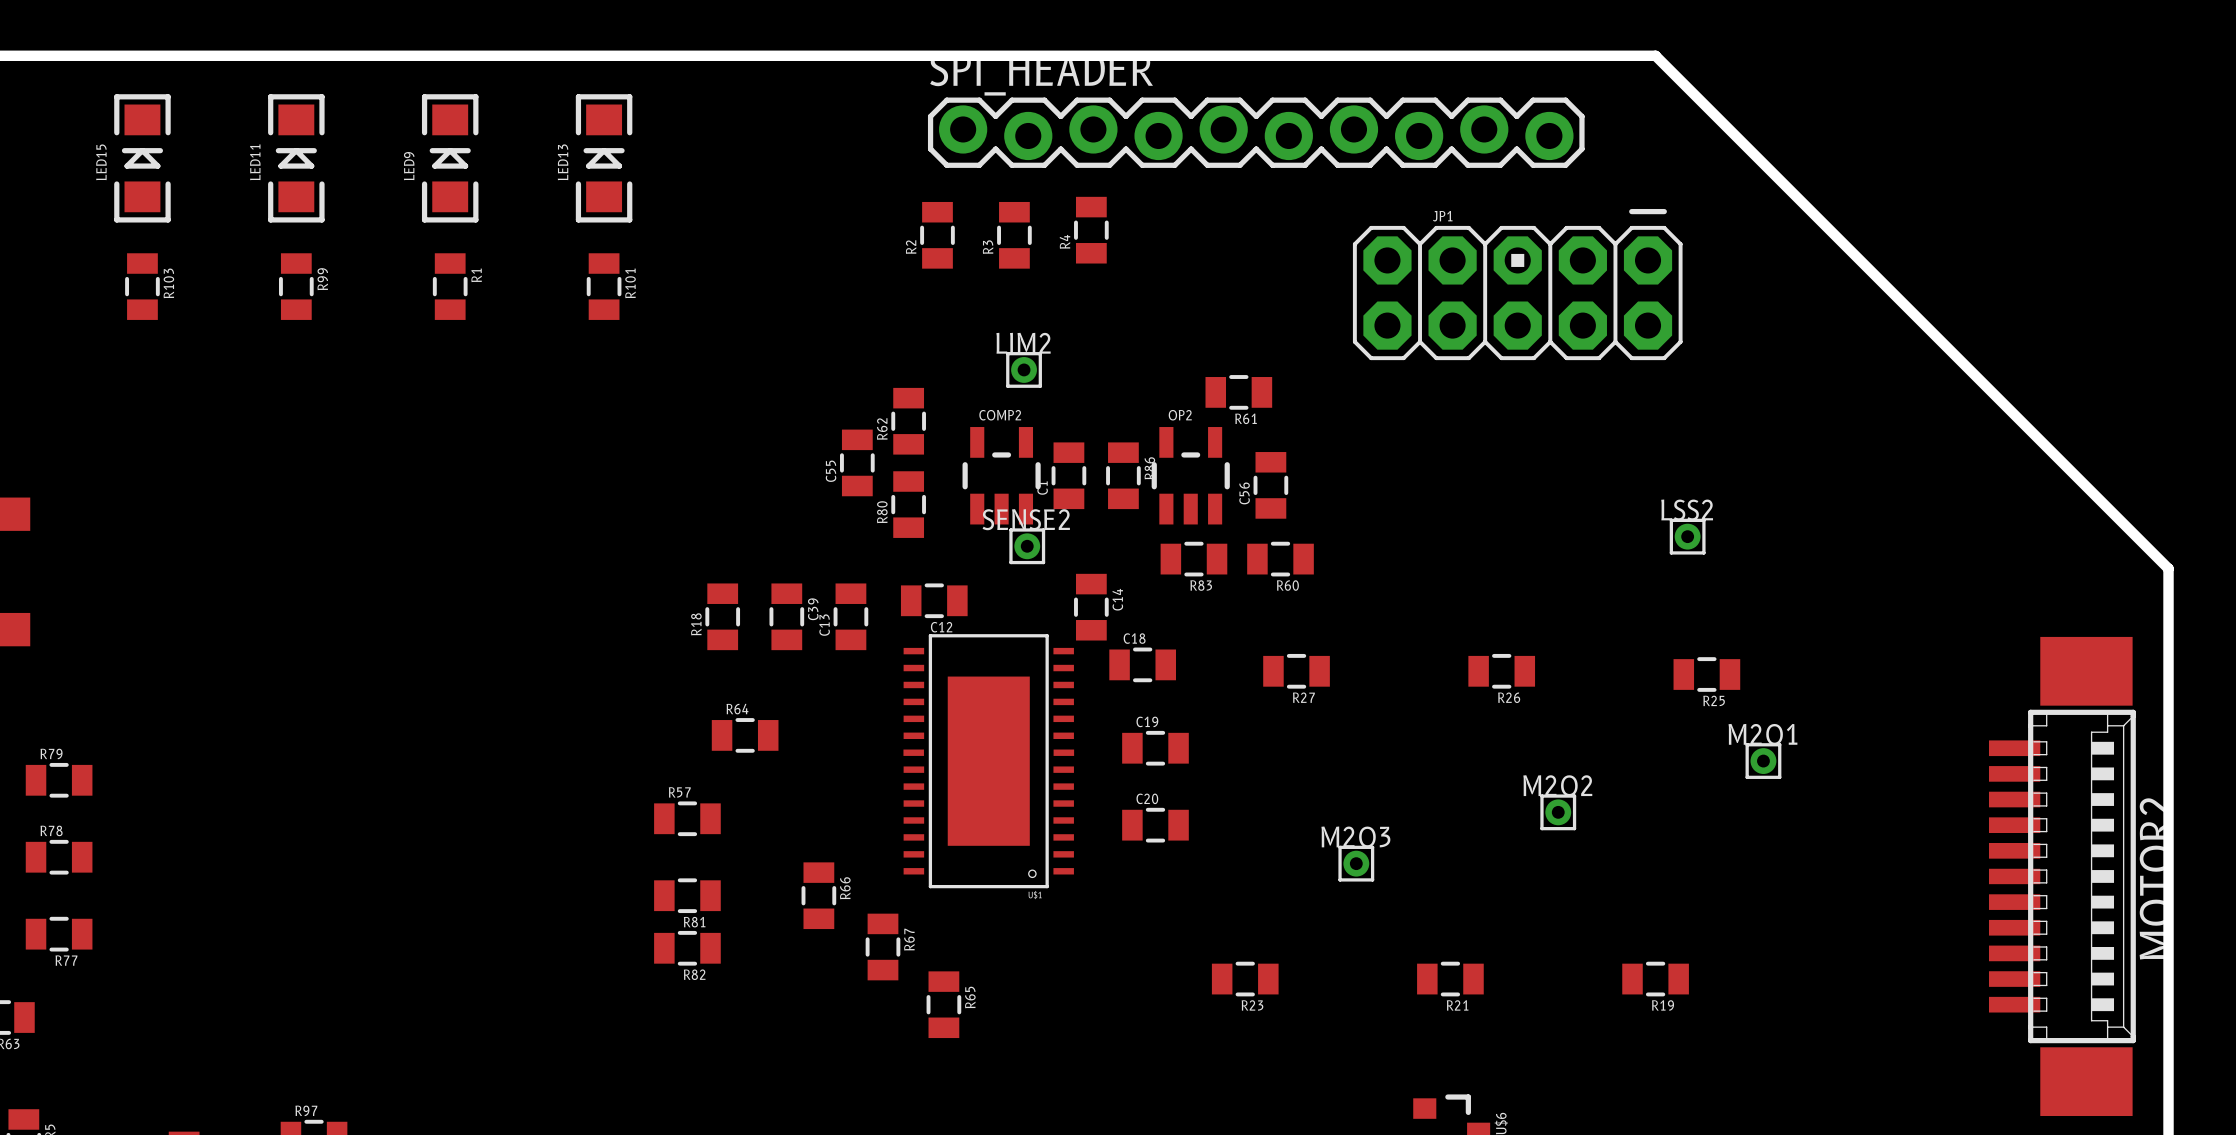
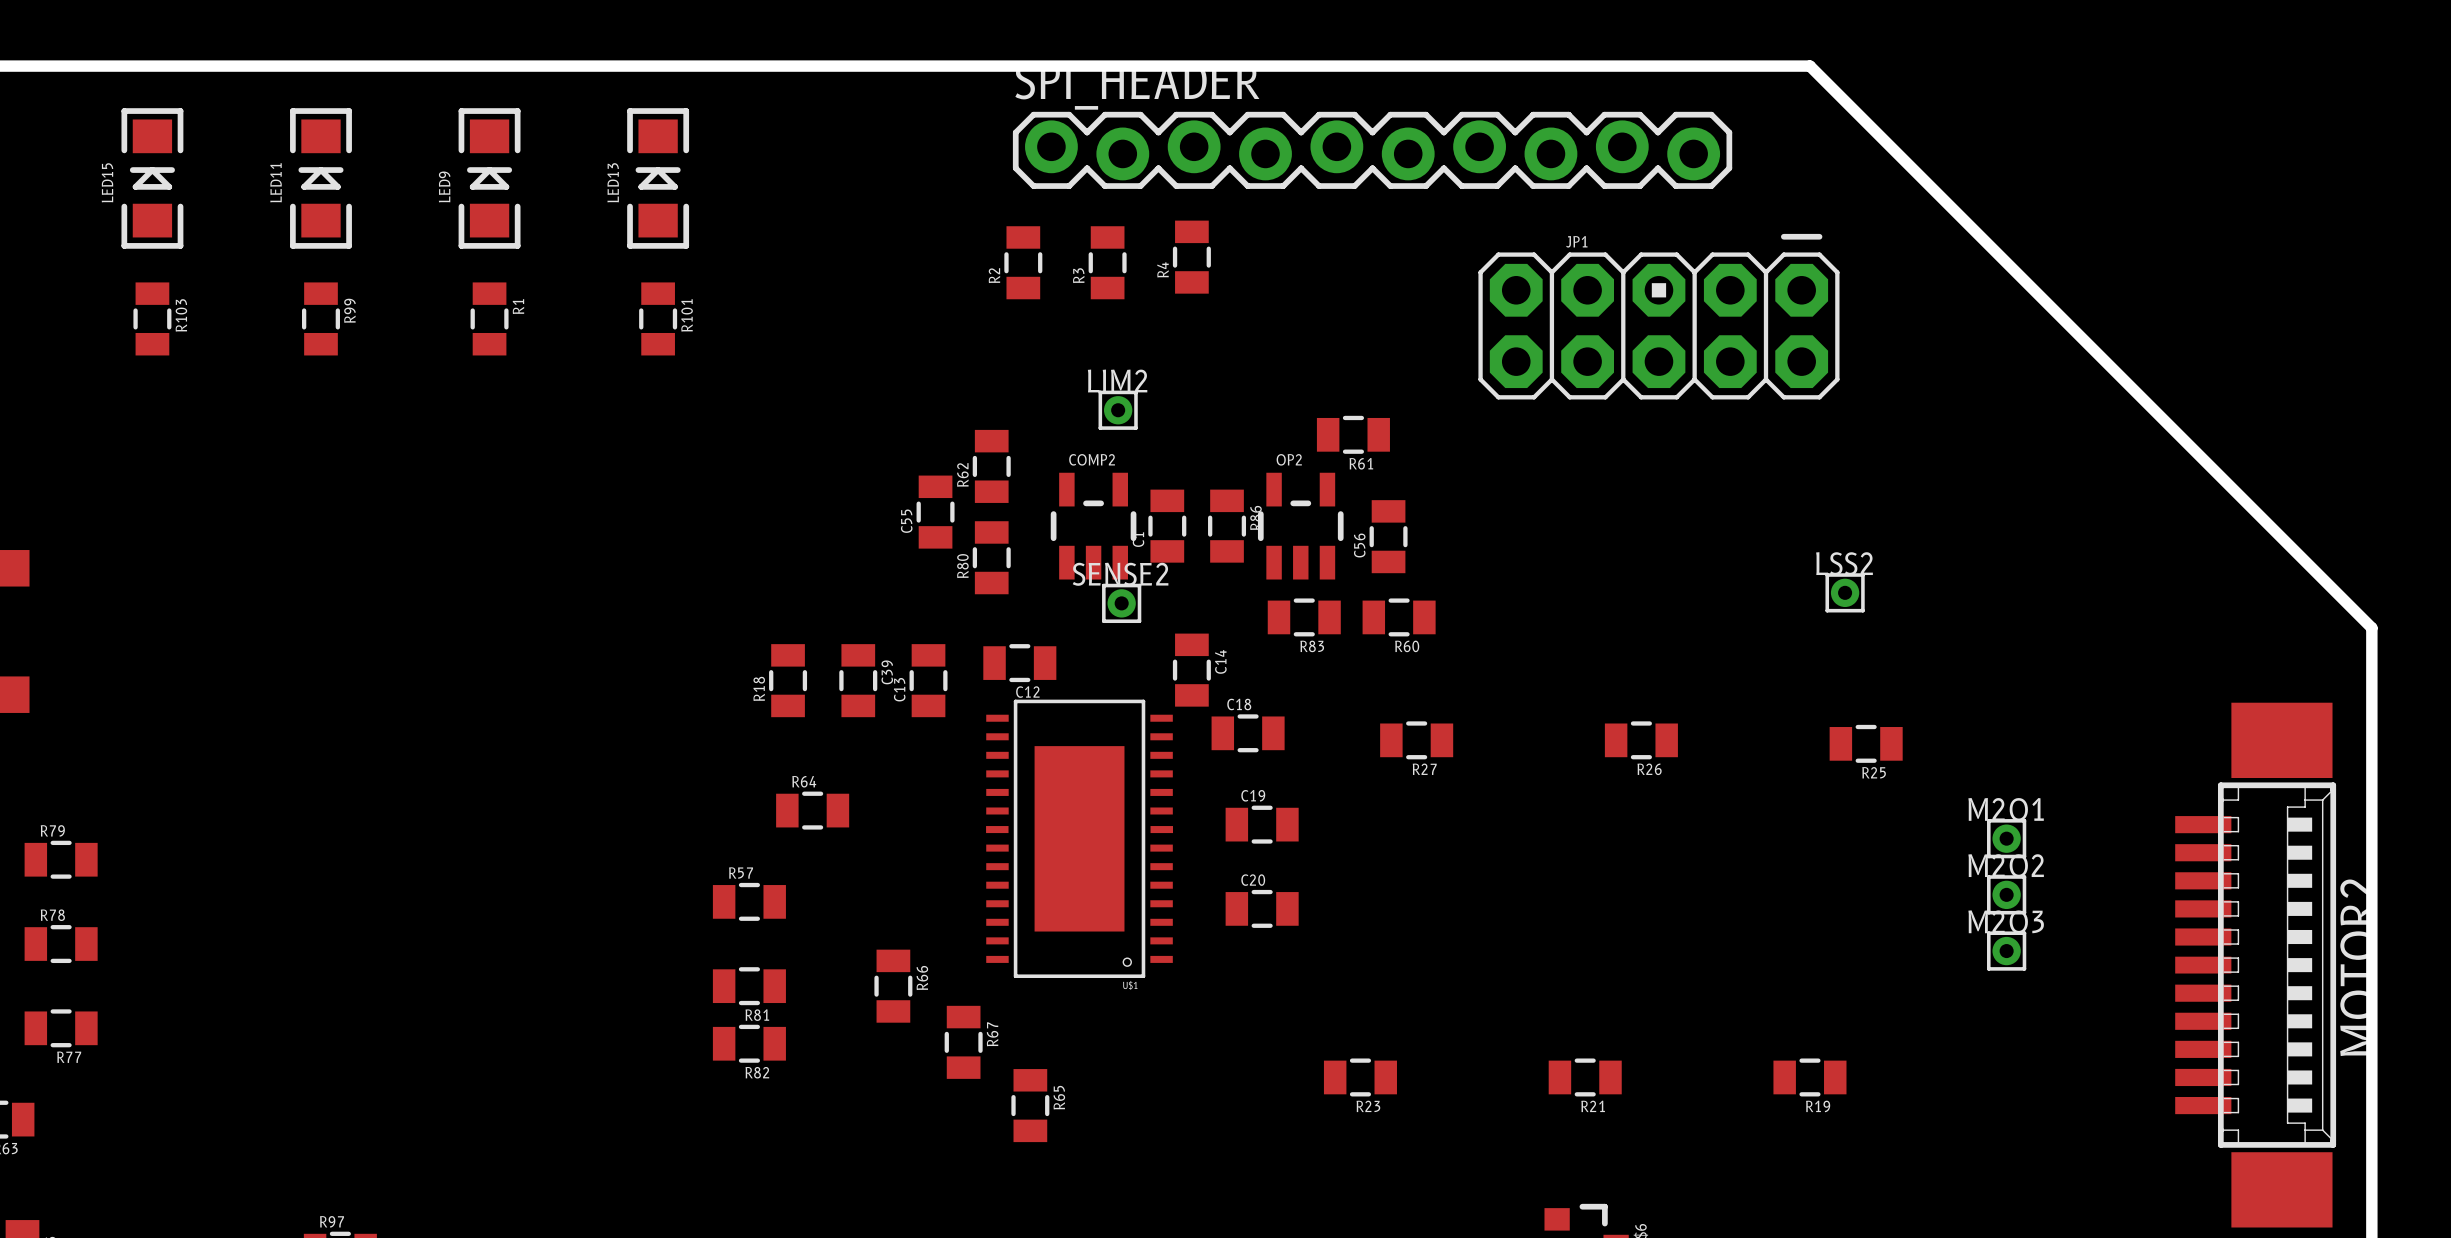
M2O1 position: (1763, 761) -> (2006, 838)
M2O2 position: (1558, 812) -> (2006, 894)
M2O3 position: (1356, 863) -> (2006, 951)

